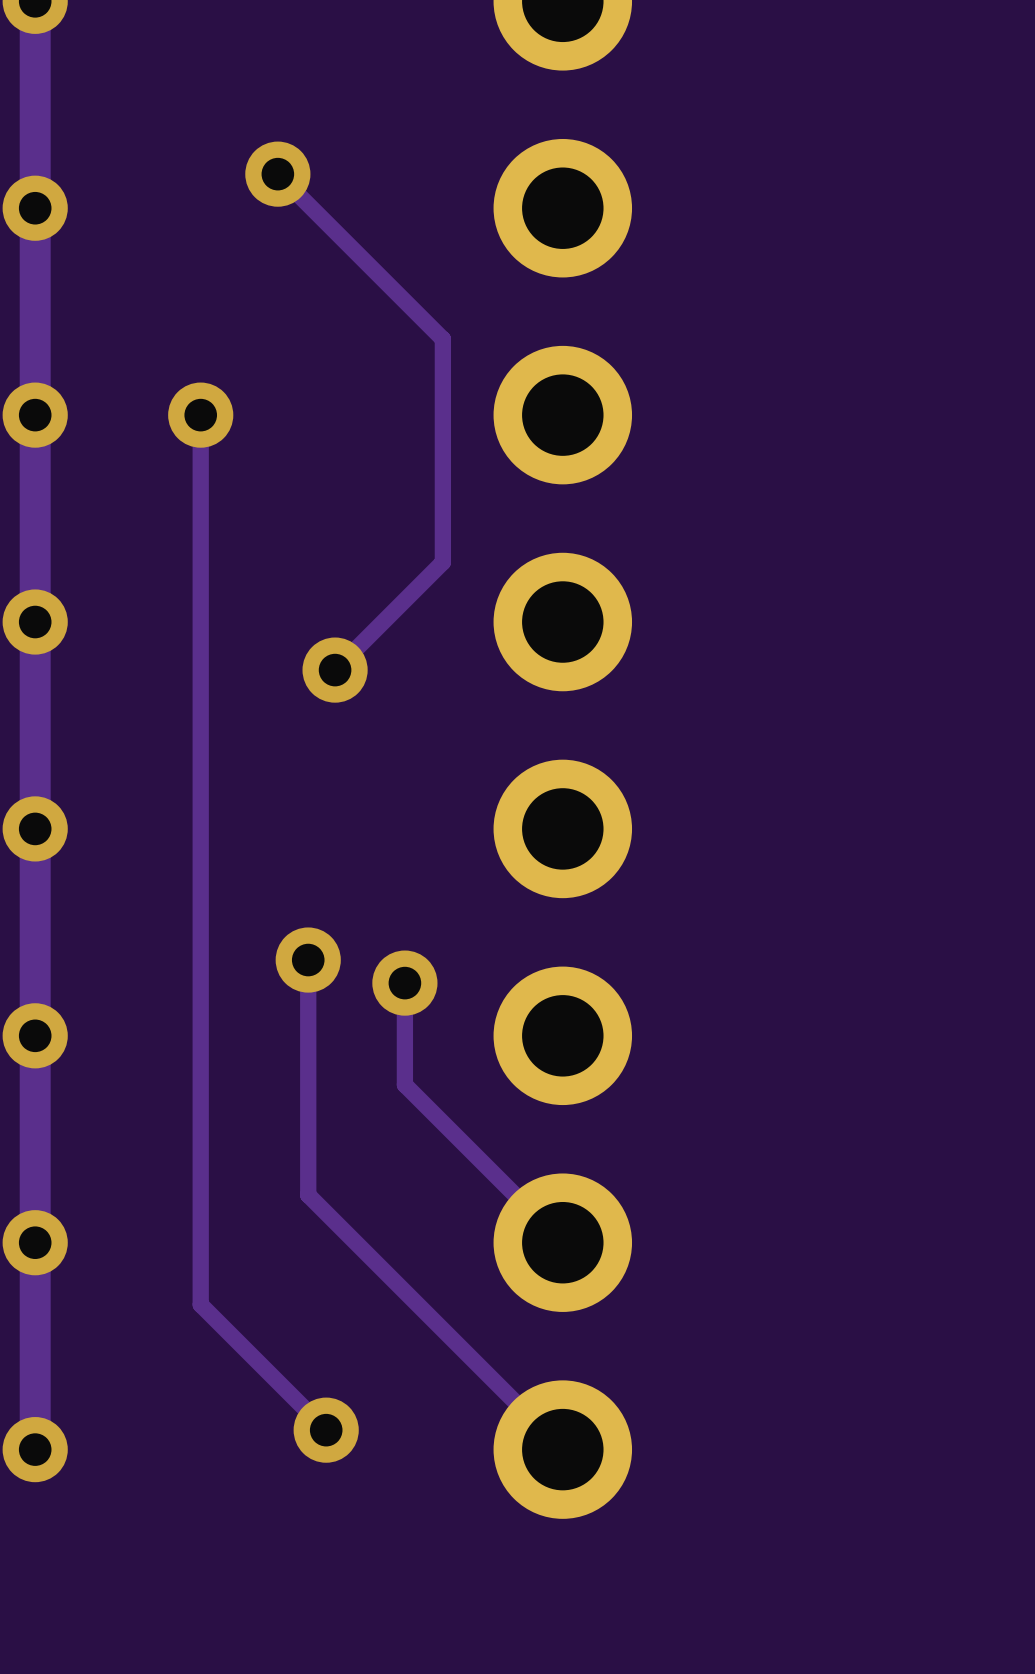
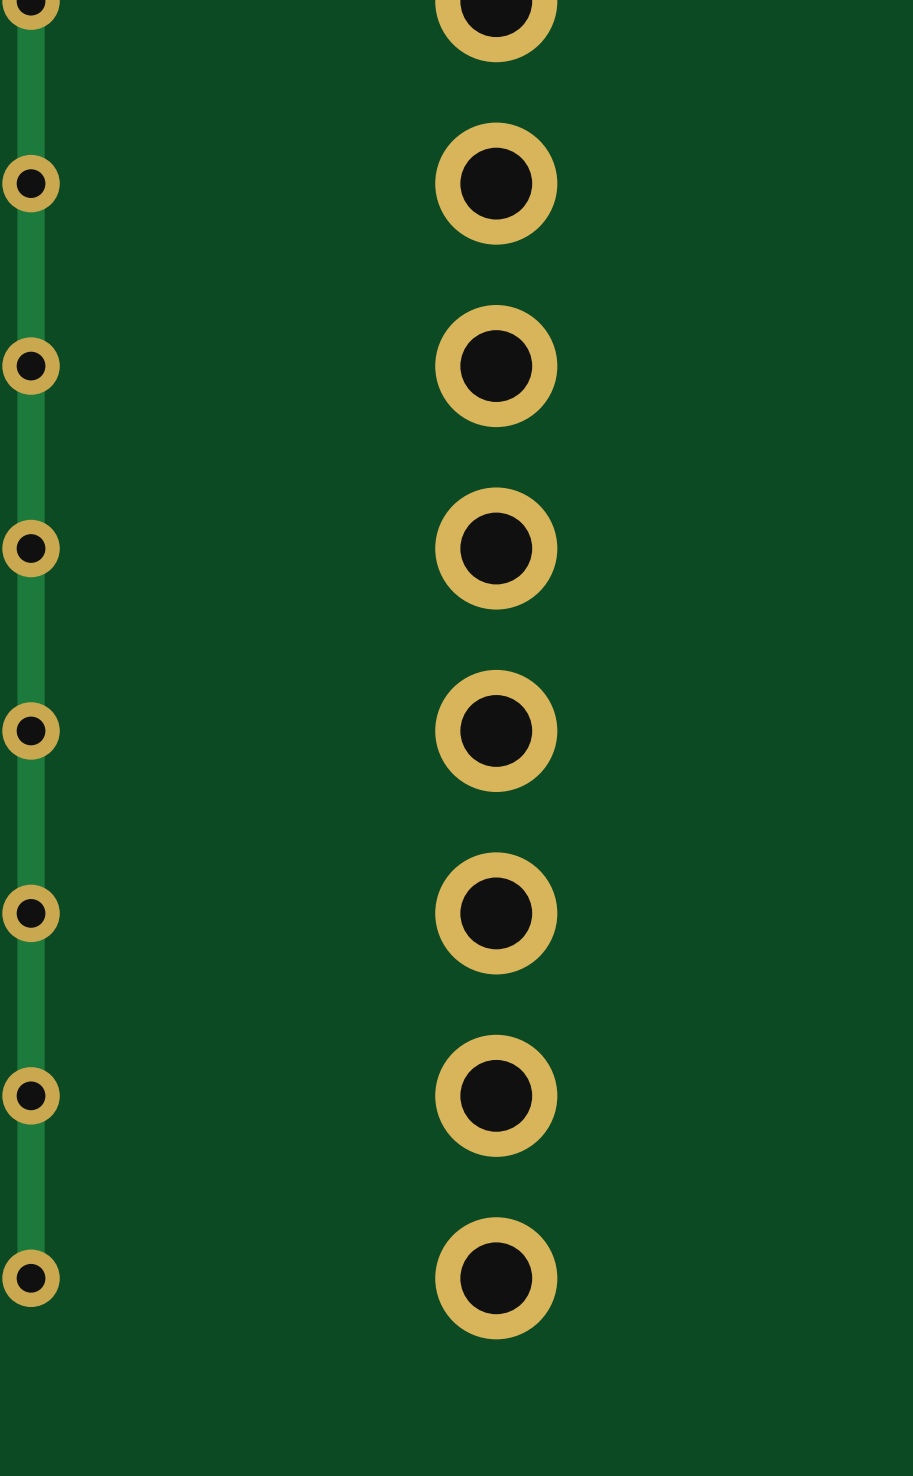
track: (277, 174) (442, 339) (442, 562) (335, 670) -> none
via: (277, 174) -> none
track: (200, 415) (200, 1304) (326, 1430) -> none
via: (200, 415) -> none
via: (335, 670) -> none
track: (308, 960) (308, 1195) (562, 1449) -> none
via: (308, 960) -> none
track: (404, 983) (404, 1084) (562, 1242) -> none
via: (404, 983) -> none
via: (326, 1430) -> none

